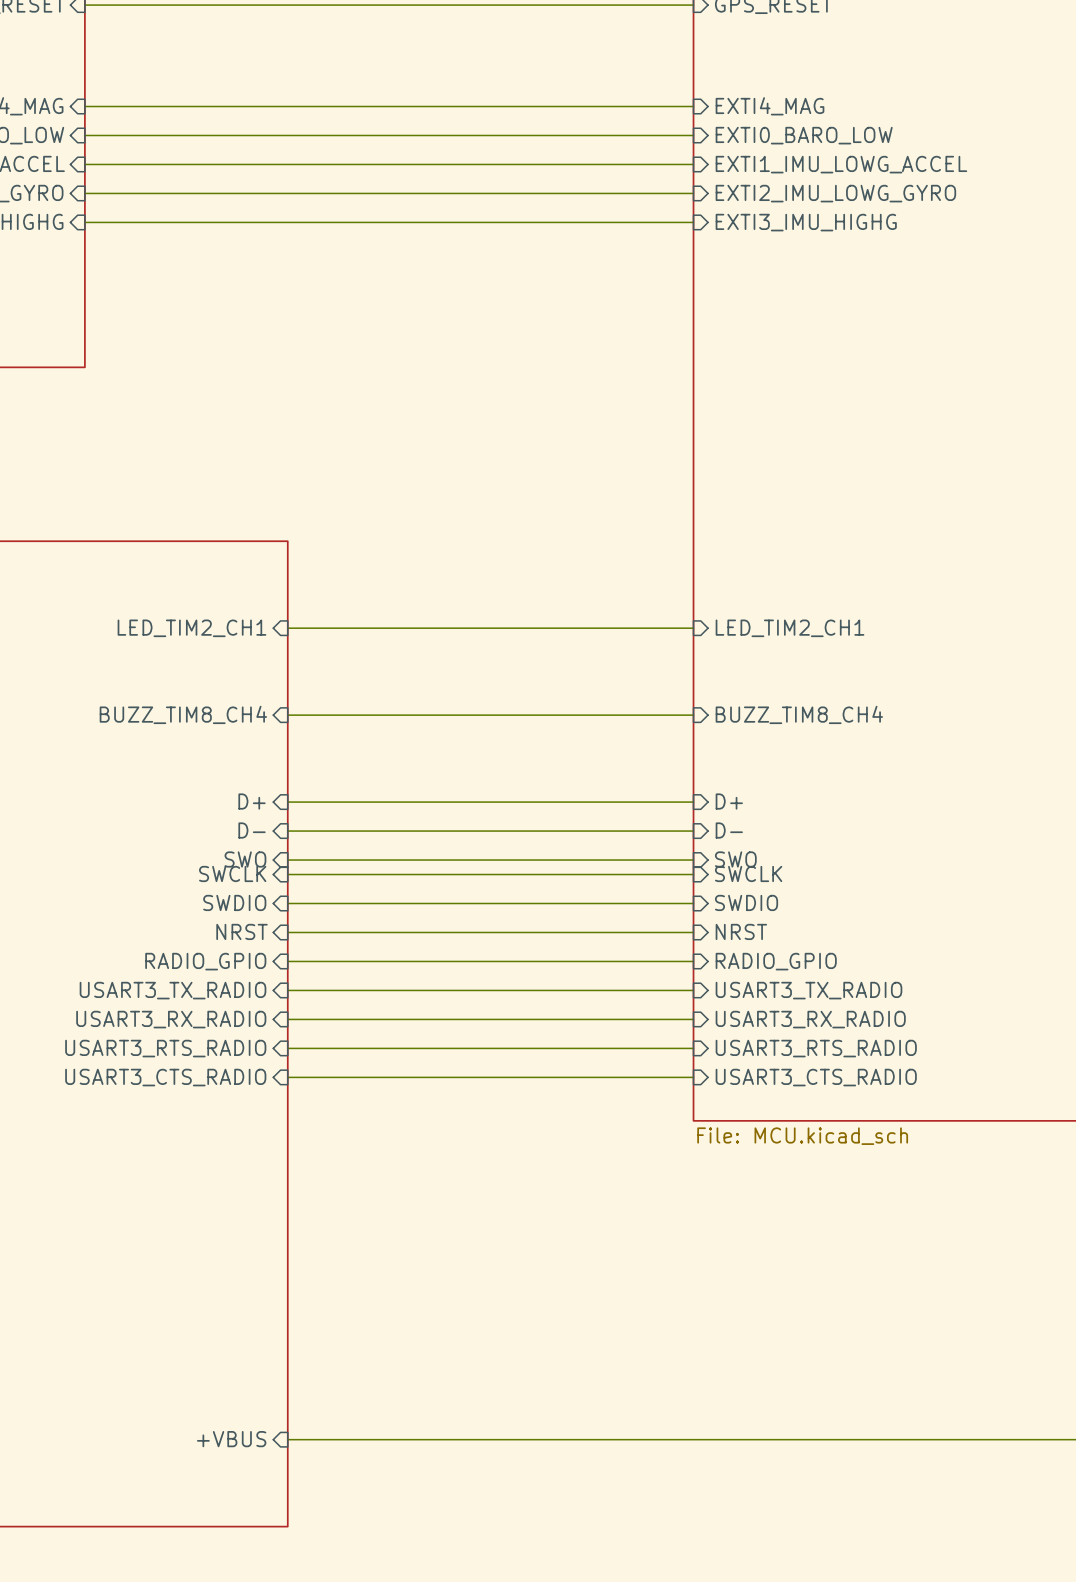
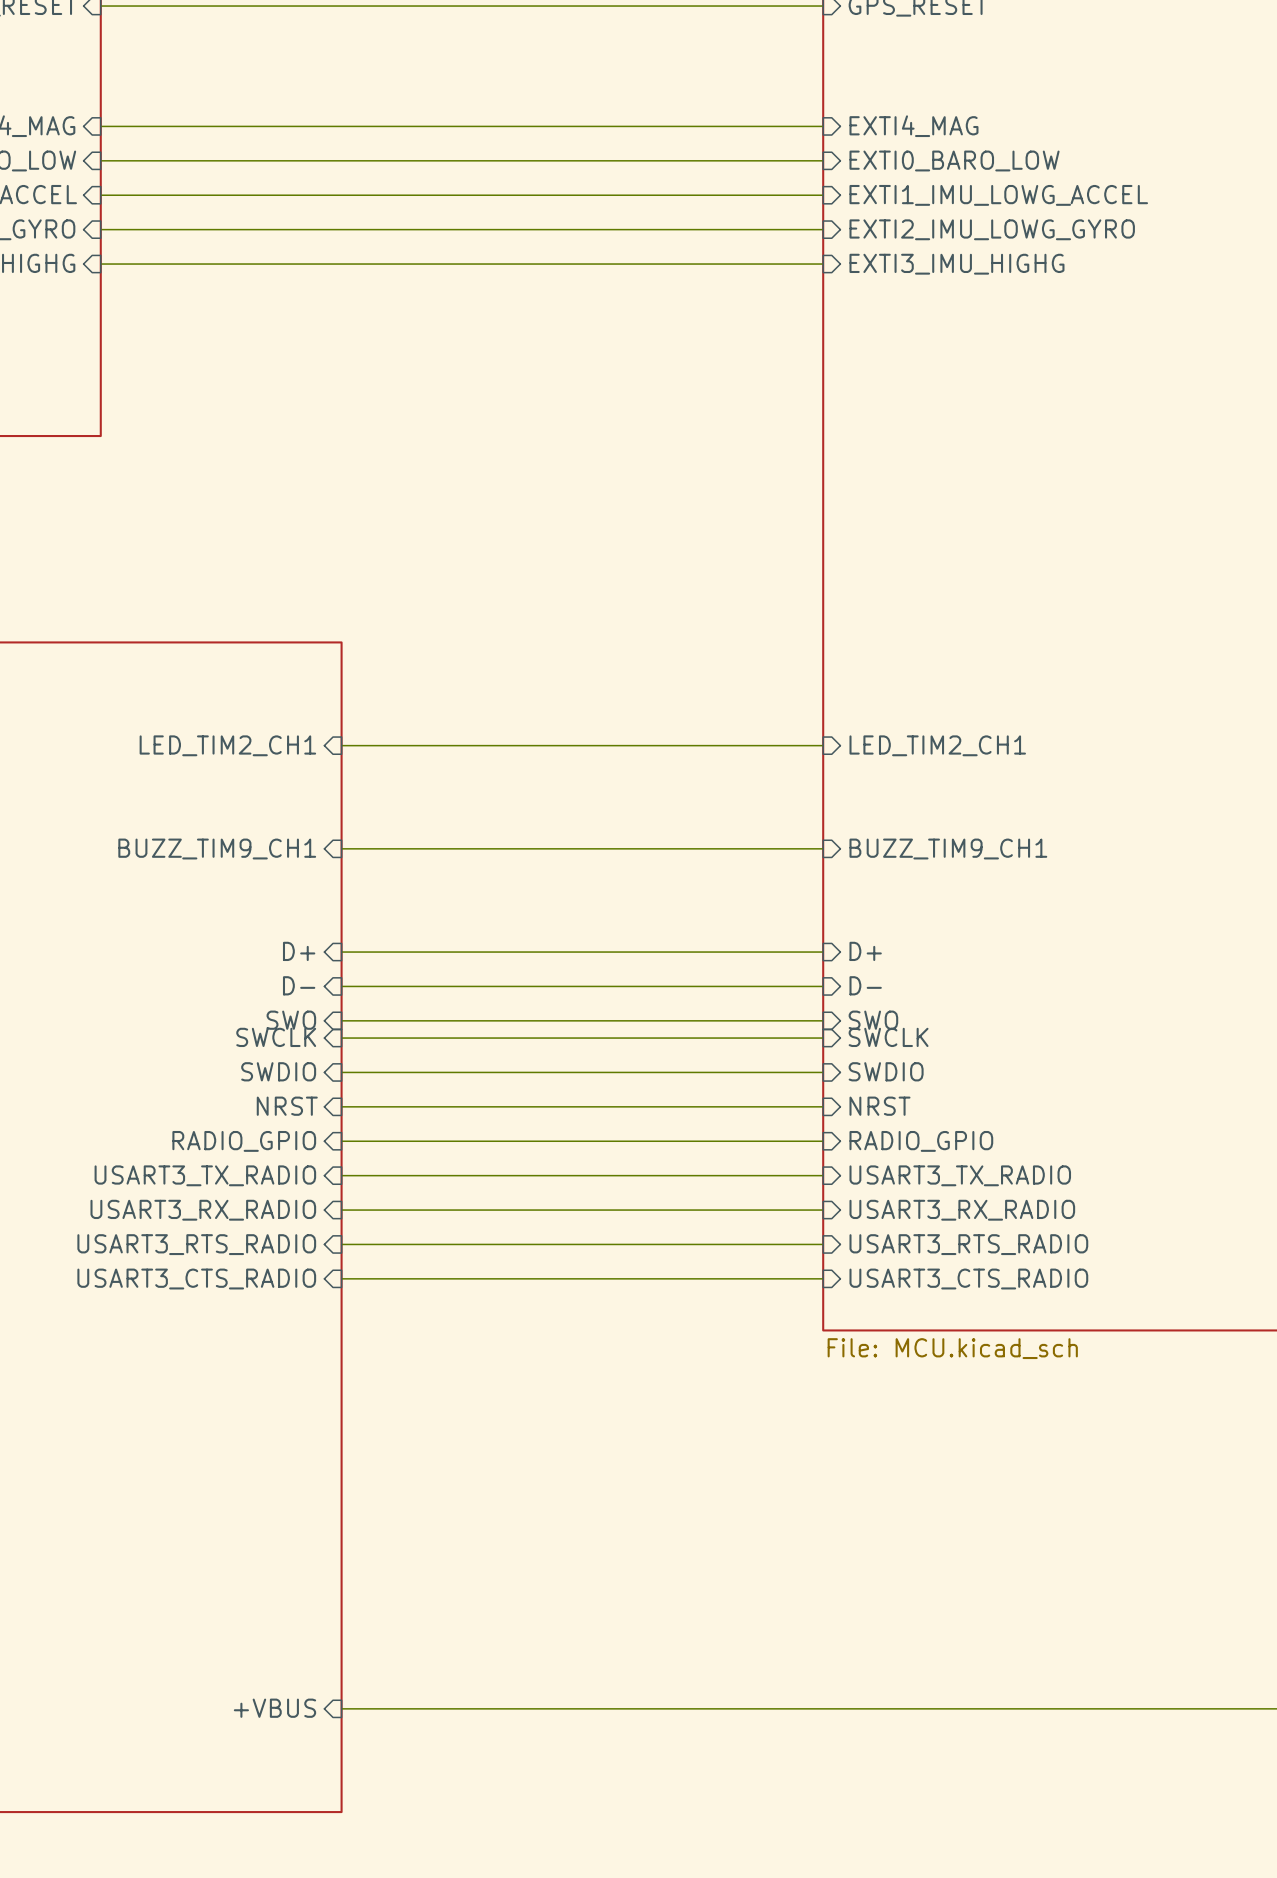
sheet pin: BUZZ_TIM8_CH4 (183, 714) -> BUZZ_TIM9_CH1 (217, 849)
sheet pin: BUZZ_TIM8_CH4 (799, 714) -> BUZZ_TIM9_CH1 (948, 849)

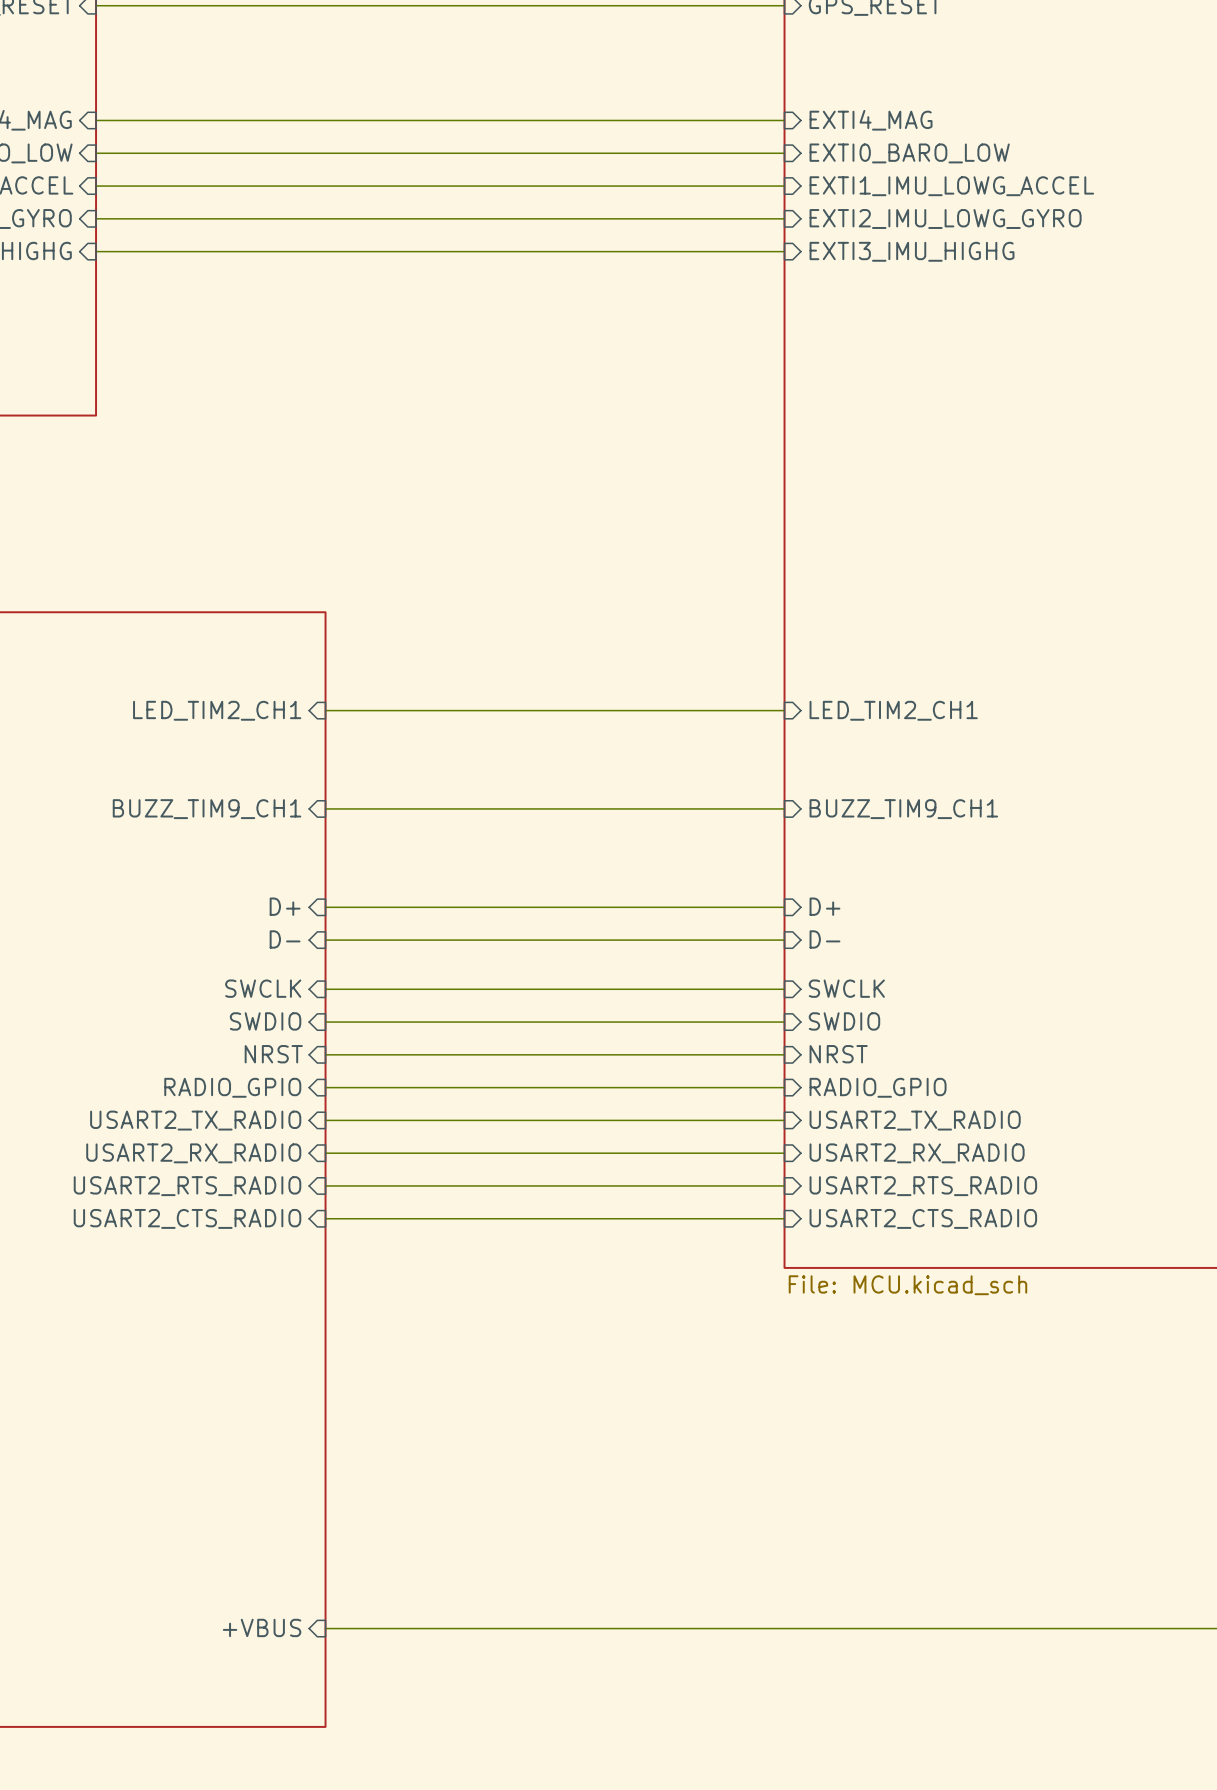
sheet pin: SWO (291, 1020) -> none
wire: (341, 1020) (823, 1020) -> none
sheet pin: SWO (873, 1020) -> none
sheet pin: USART3_TX_RADIO (205, 1175) -> USART2_TX_RADIO (195, 1120)
sheet pin: USART3_TX_RADIO (960, 1175) -> USART2_TX_RADIO (915, 1120)
sheet pin: USART3_RX_RADIO (203, 1210) -> USART2_RX_RADIO (193, 1153)
sheet pin: USART3_RX_RADIO (962, 1210) -> USART2_RX_RADIO (917, 1153)
sheet pin: USART3_RTS_RADIO (196, 1244) -> USART2_RTS_RADIO (187, 1186)
sheet pin: USART3_RTS_RADIO (968, 1244) -> USART2_RTS_RADIO (923, 1186)
sheet pin: USART3_CTS_RADIO (196, 1279) -> USART2_CTS_RADIO (187, 1218)
sheet pin: USART3_CTS_RADIO (968, 1279) -> USART2_CTS_RADIO (923, 1218)

